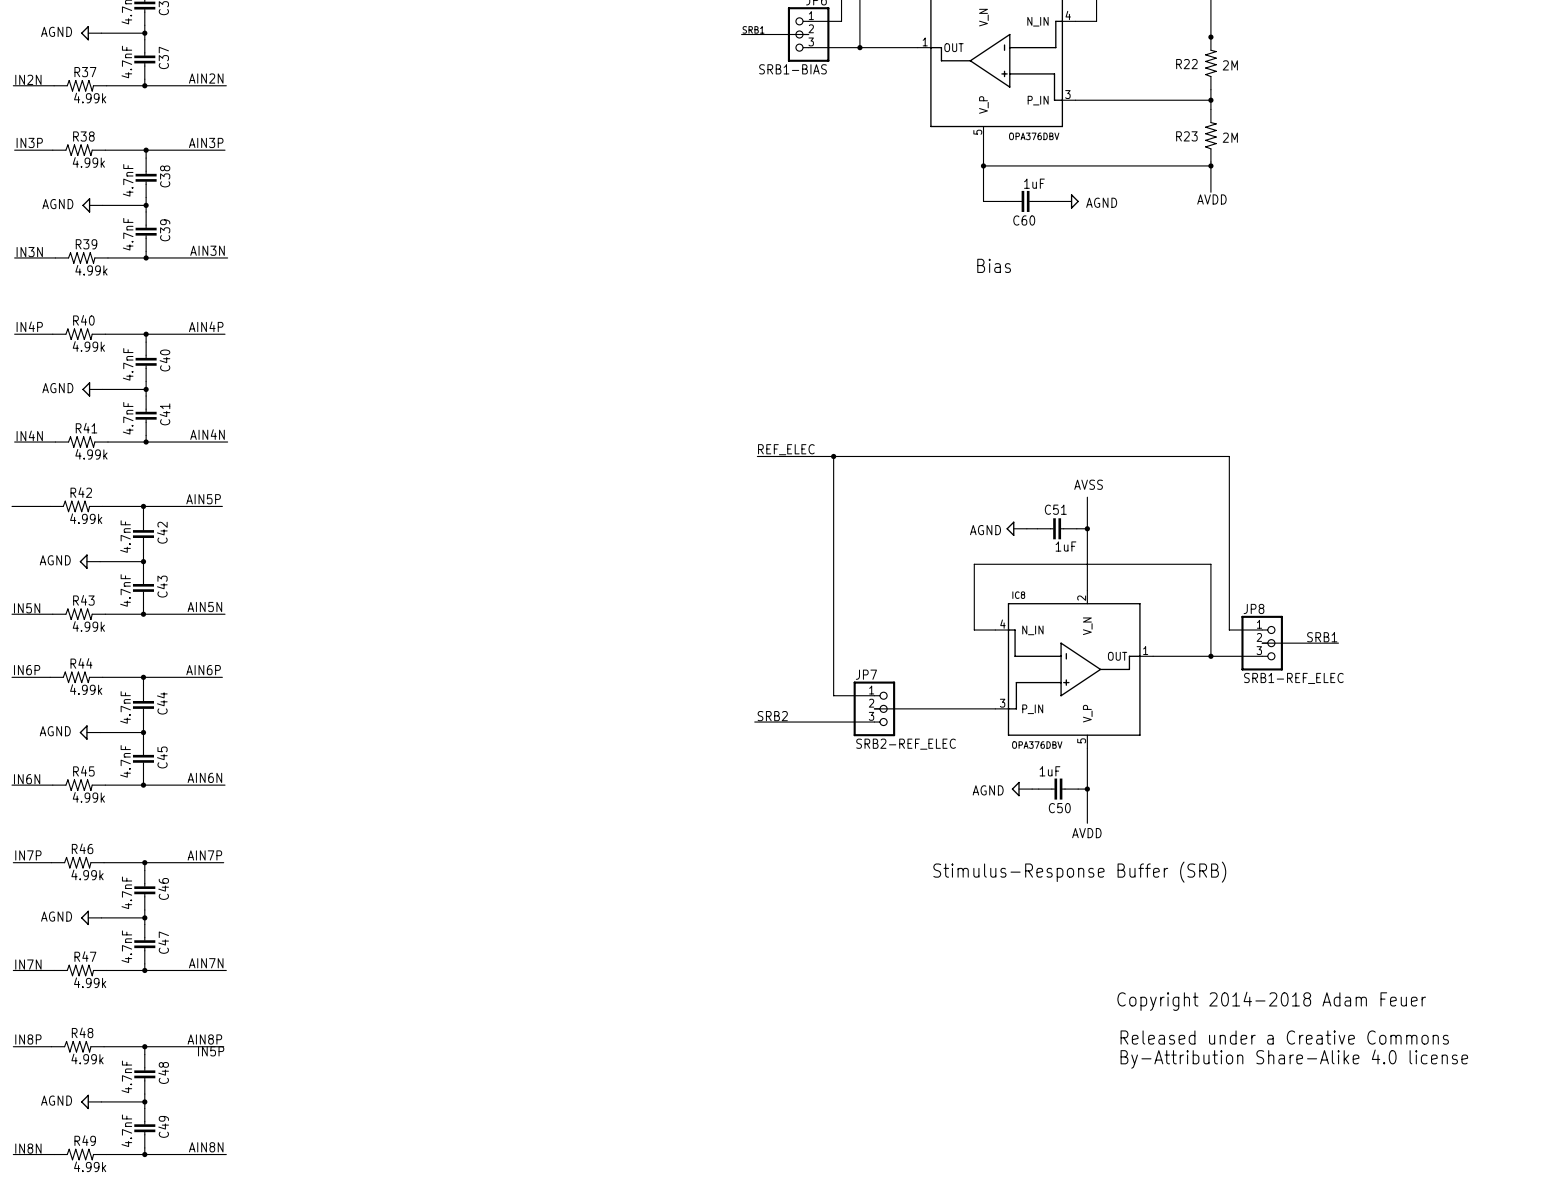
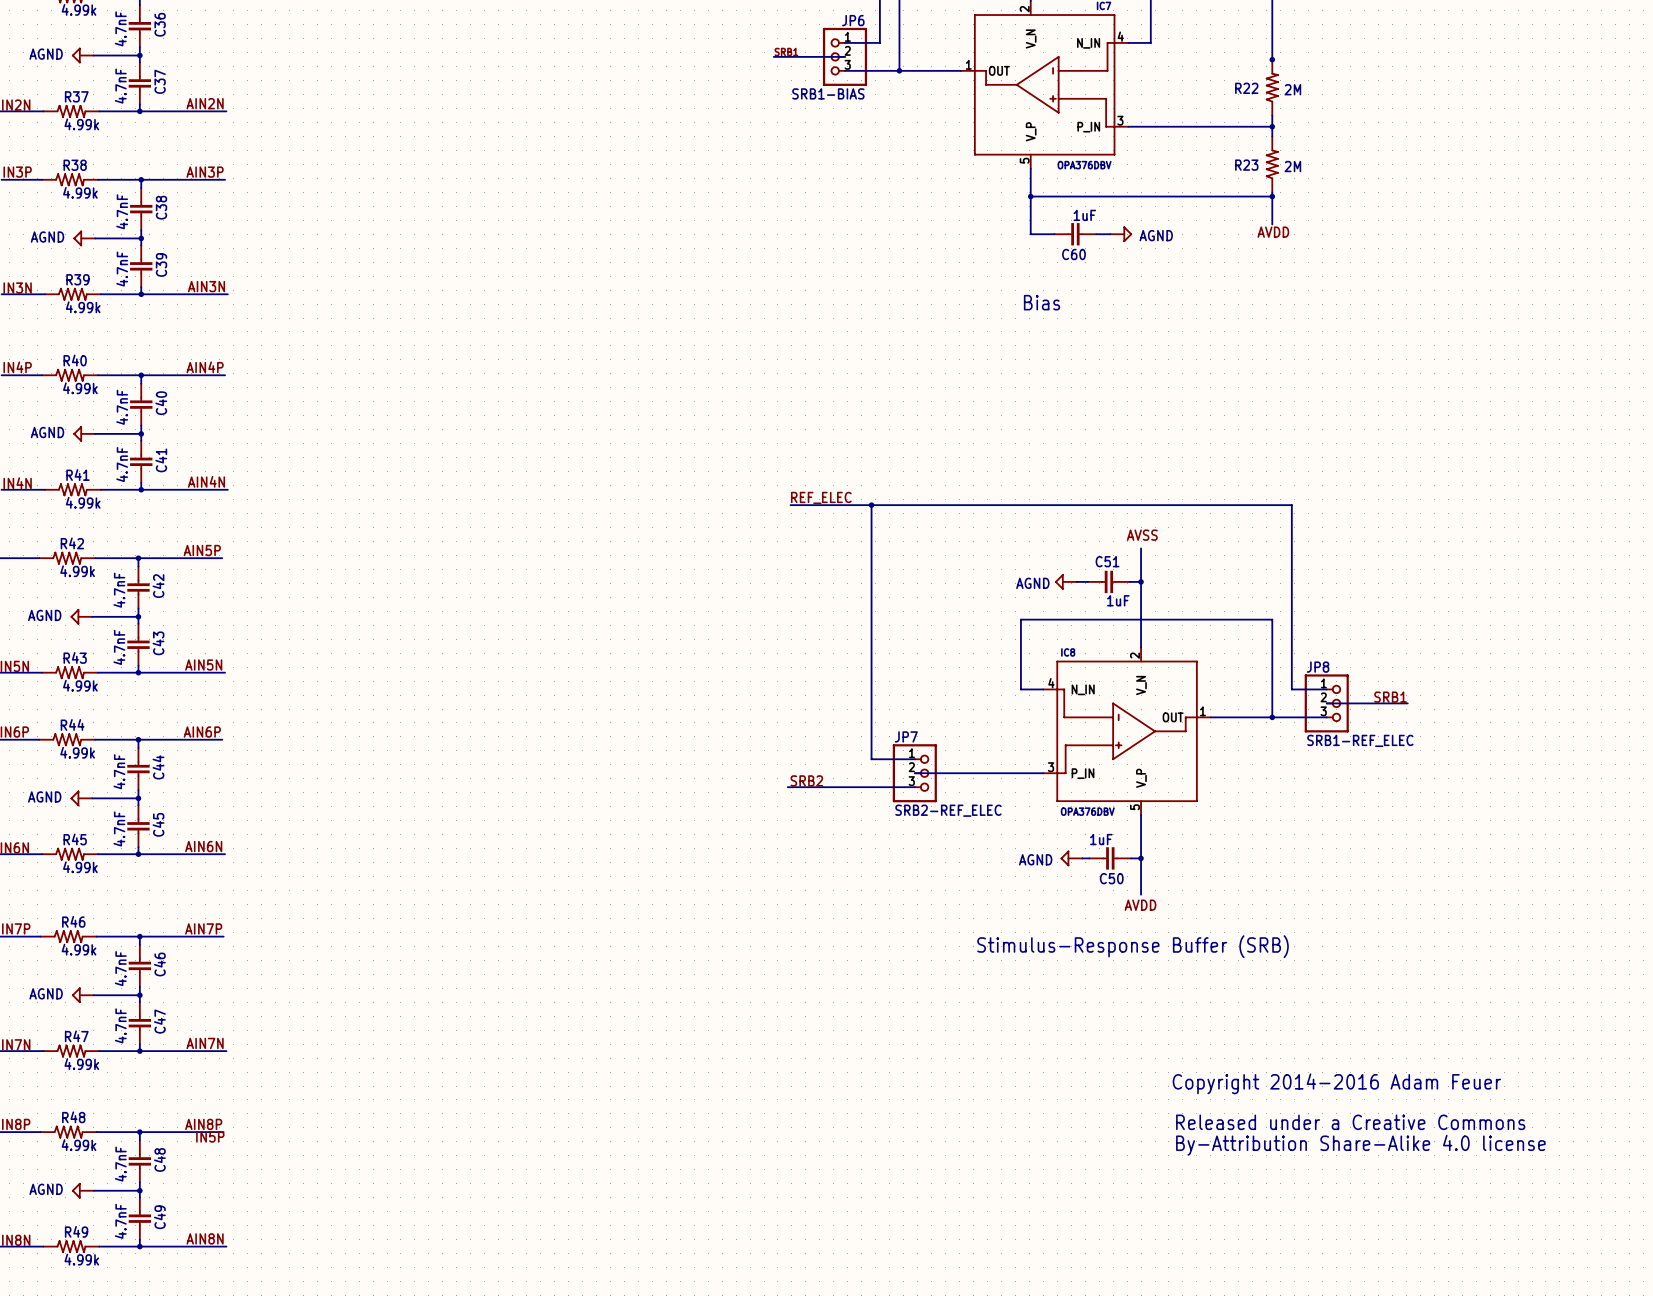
text: Copyright 2014-2018 Adam Feuer (1271, 1001) -> Copyright 2014-2016 Adam Feuer (1336, 1083)

